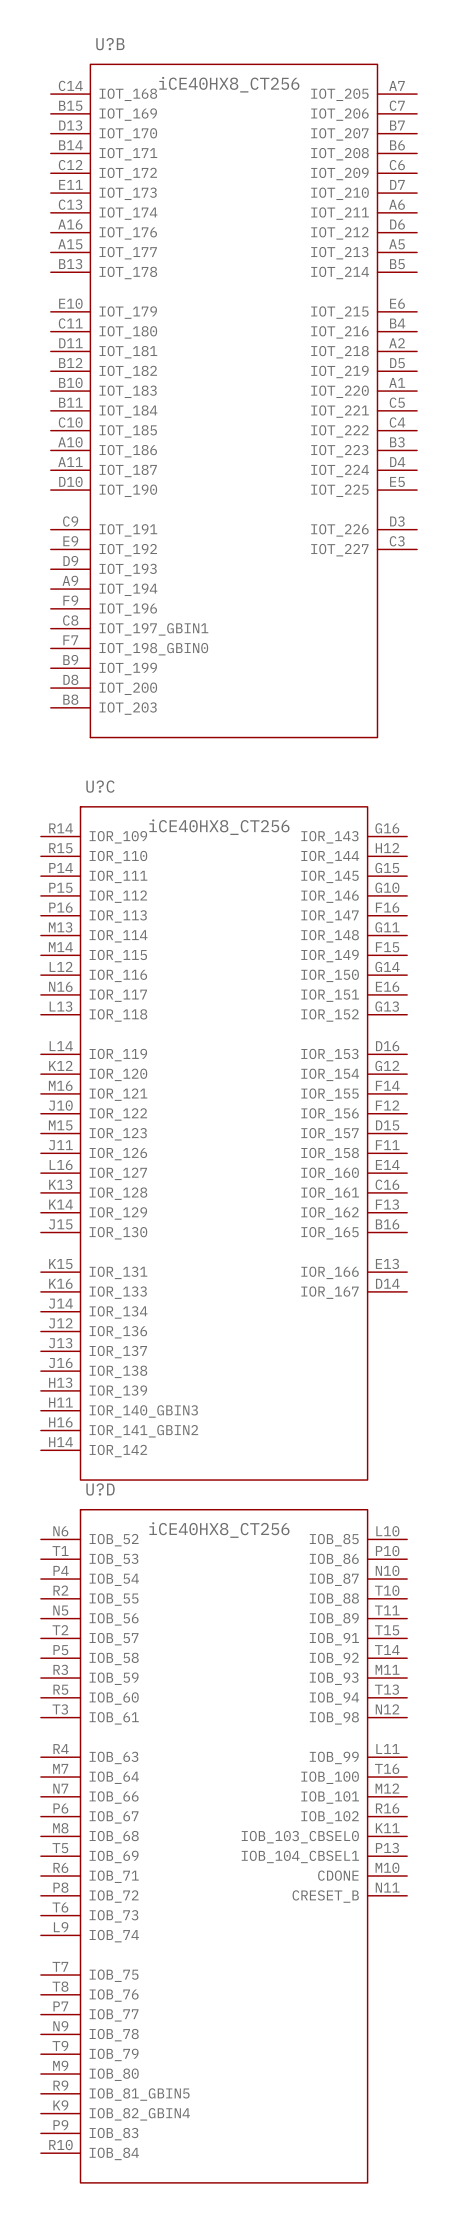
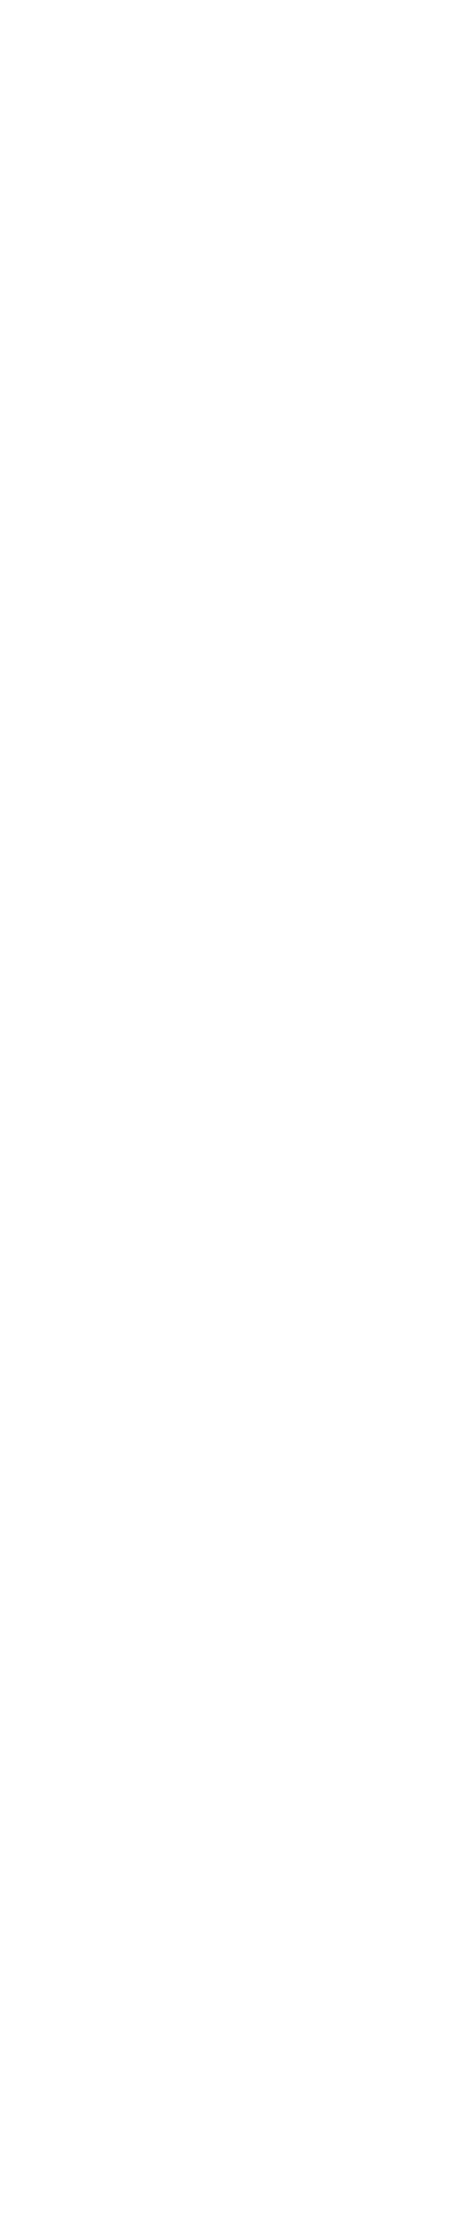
U?B: iCE40HX8_CT256 (233, 400) -> none
U?C: iCE40HX8_CT256 (224, 1143) -> none
U?D: iCE40HX8_CT256 (224, 1846) -> none

